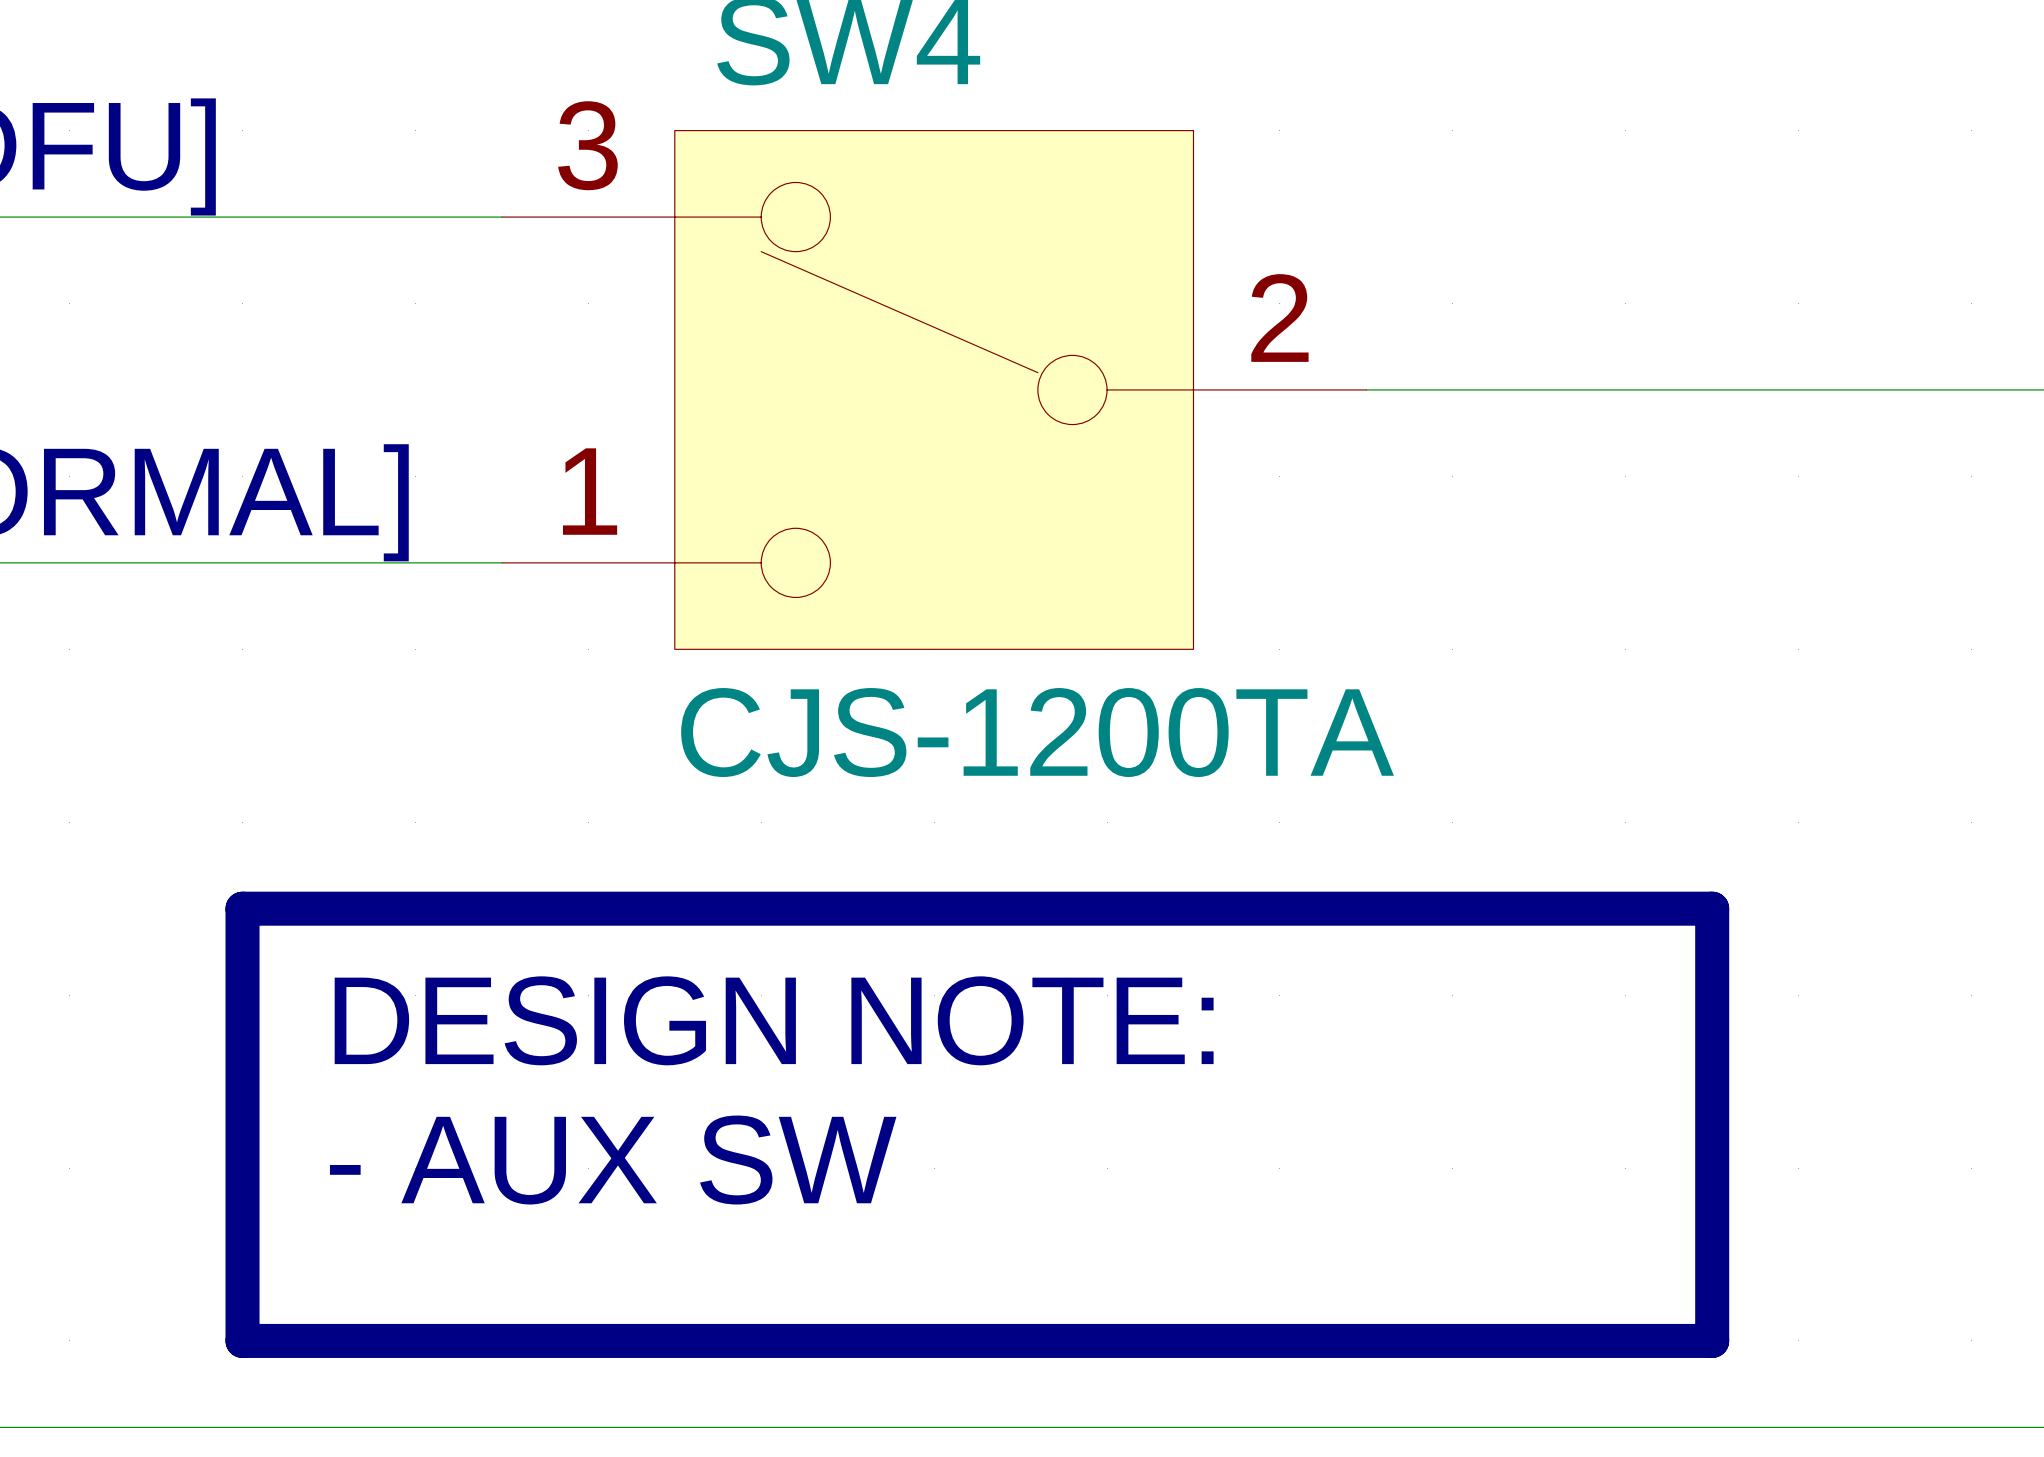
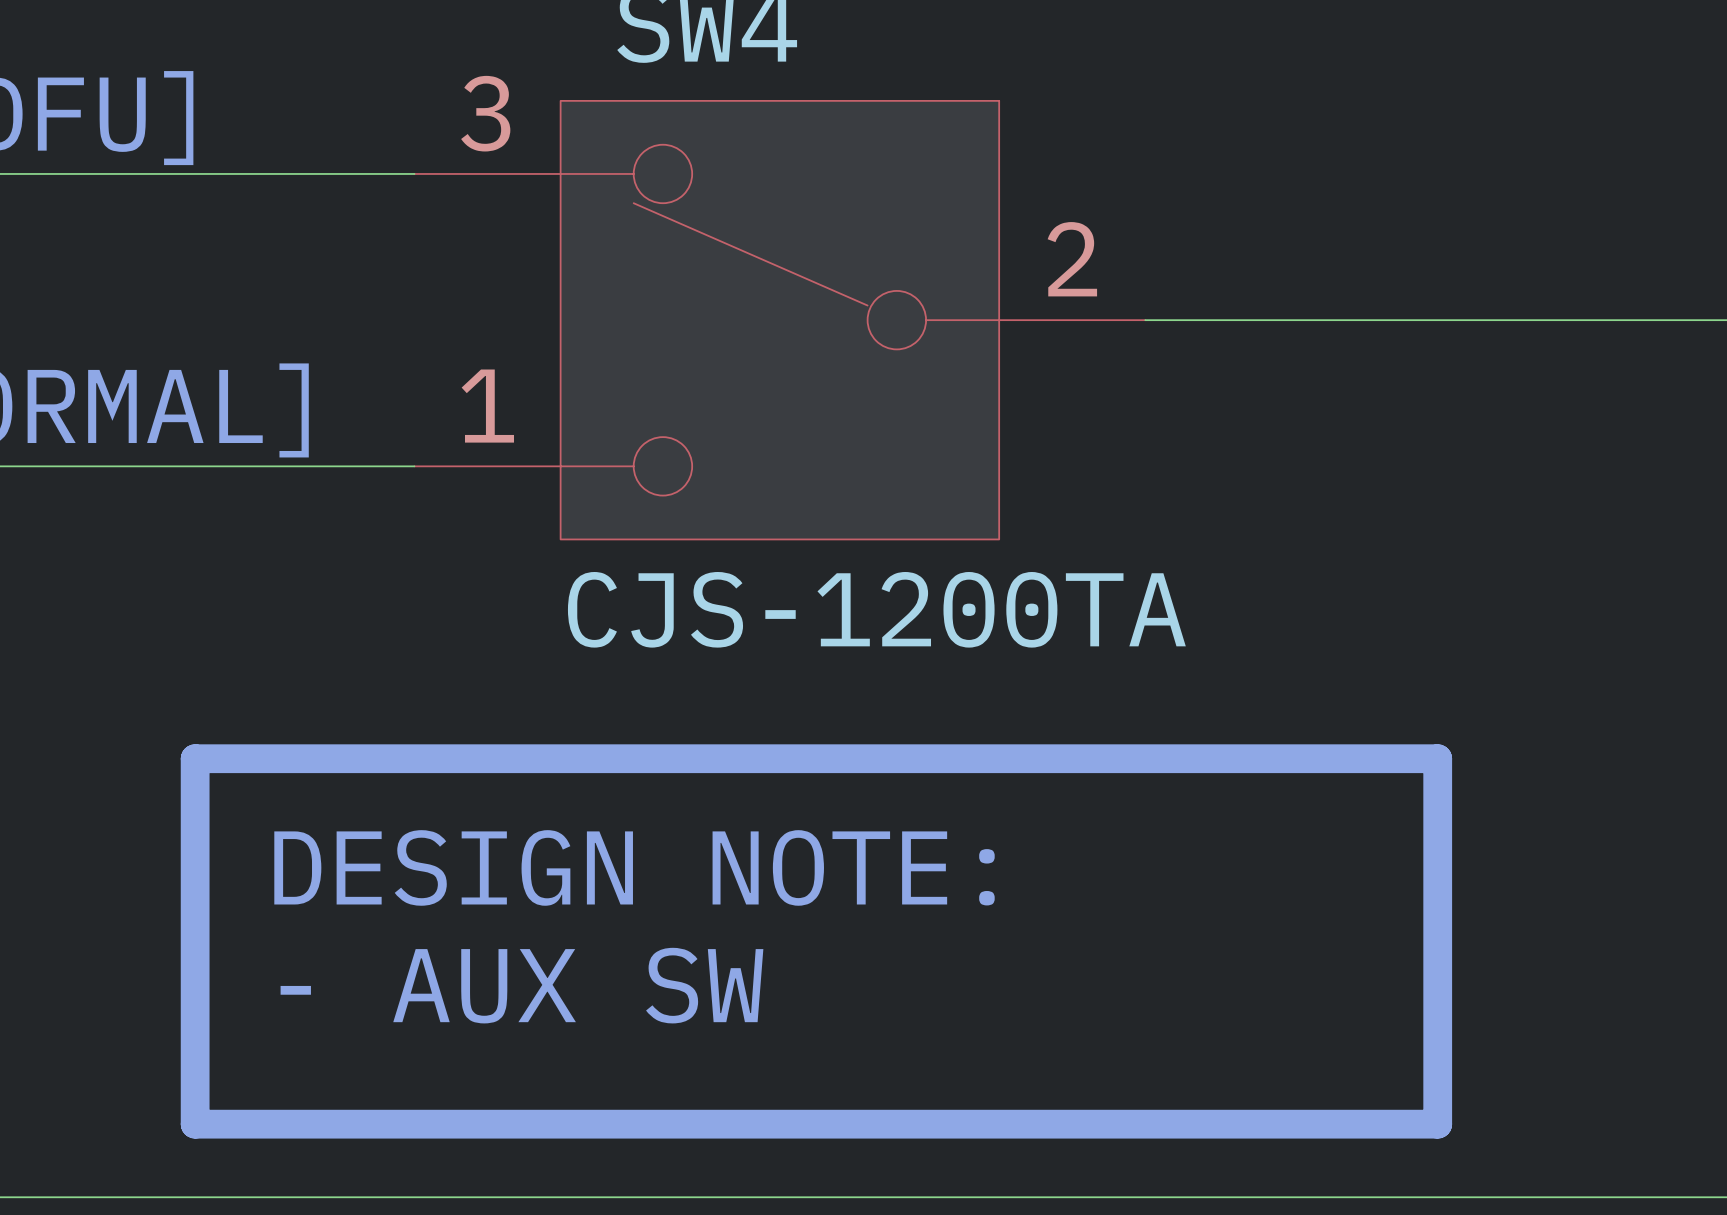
text position: DESIGN NOTE: (774, 1020) -> DESIGN NOTE: (634, 867)
text position: - AUX SW (613, 1160) -> - AUX SW (521, 985)

